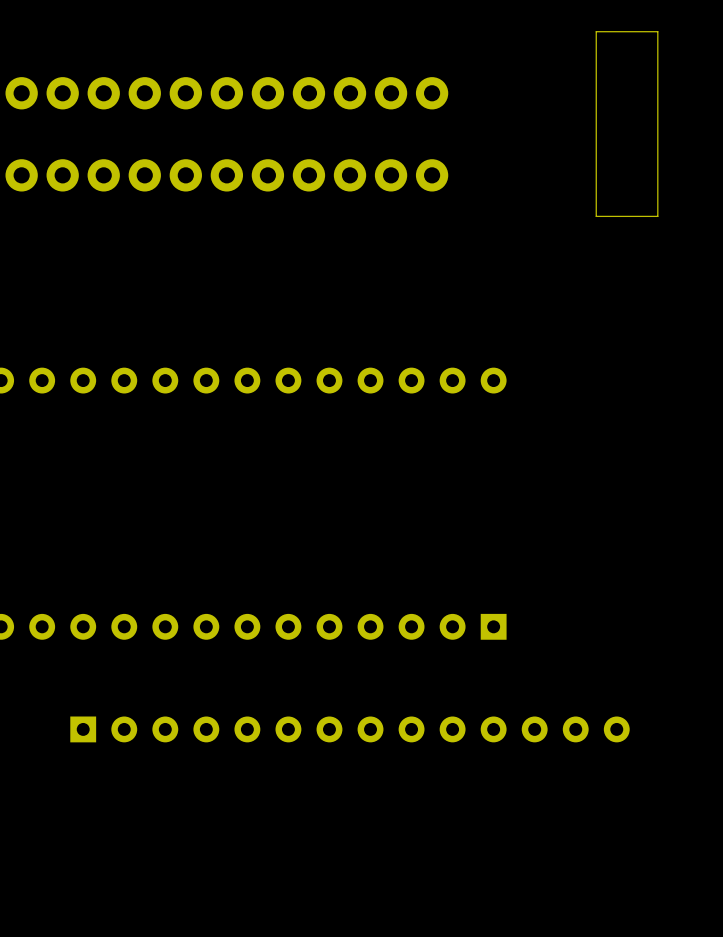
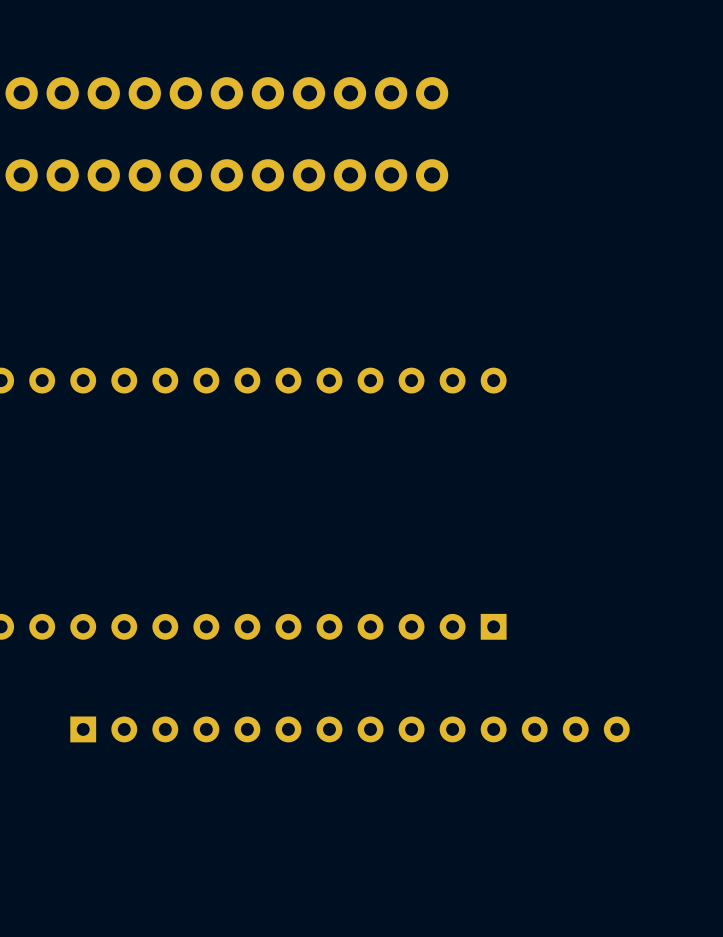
board edge: (657, 31) (657, 216) (596, 216) (596, 31) (657, 31) -> none

